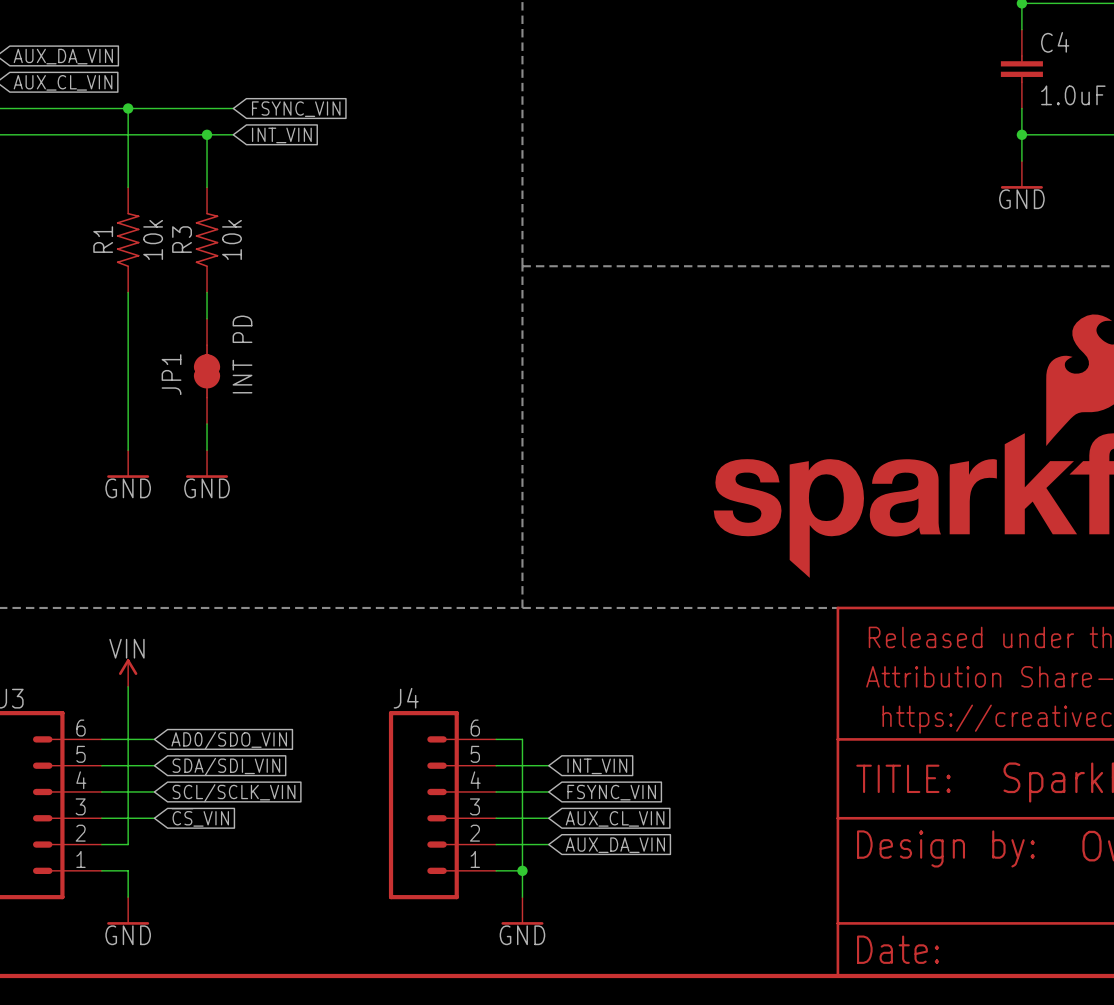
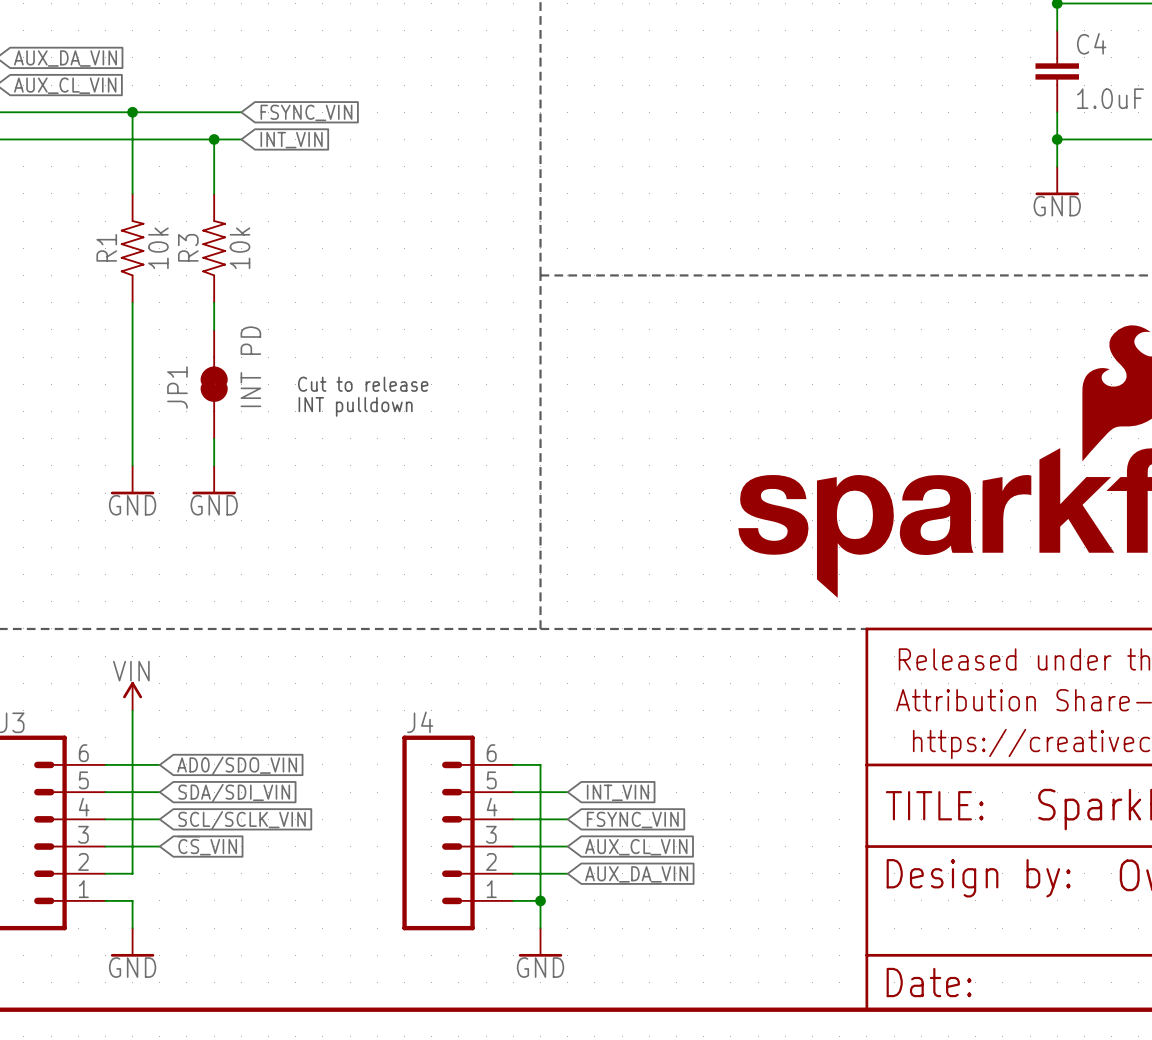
text: none -> Cut to release (363, 384)
text: none -> INT pulldown (355, 406)

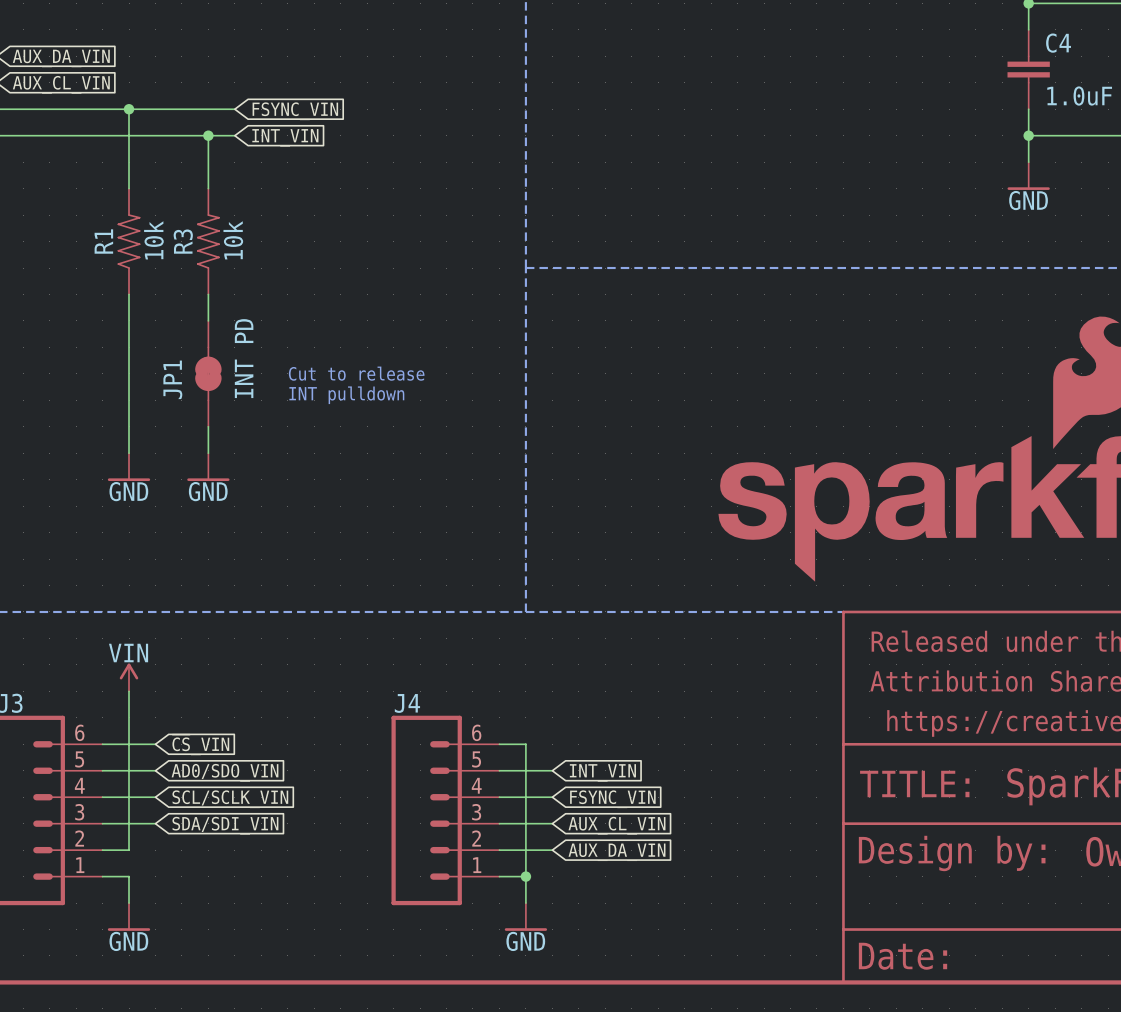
global label: AD0/SDO_VIN (237, 766) -> ~{CS}_VIN (200, 744)
global label: SDA/SDI_VIN (234, 793) -> AD0/SDO_VIN (225, 772)
global label: ~{CS}_VIN (207, 845) -> SDA/SDI_VIN (225, 825)

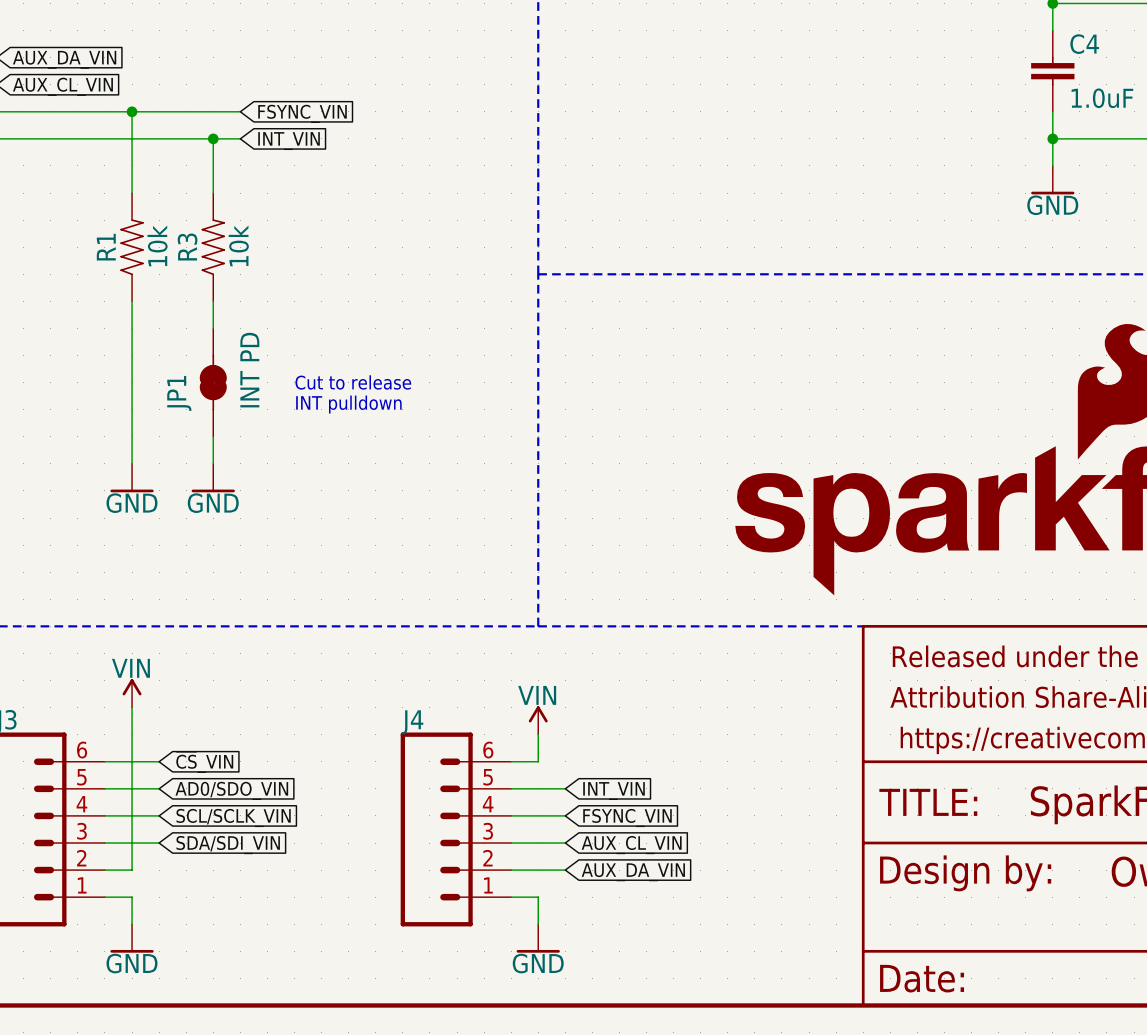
power symbol: none -> VIN (538, 720)
wire: (525, 744) (525, 876) -> (538, 761) (538, 734)
junction: (525, 876) -> none

